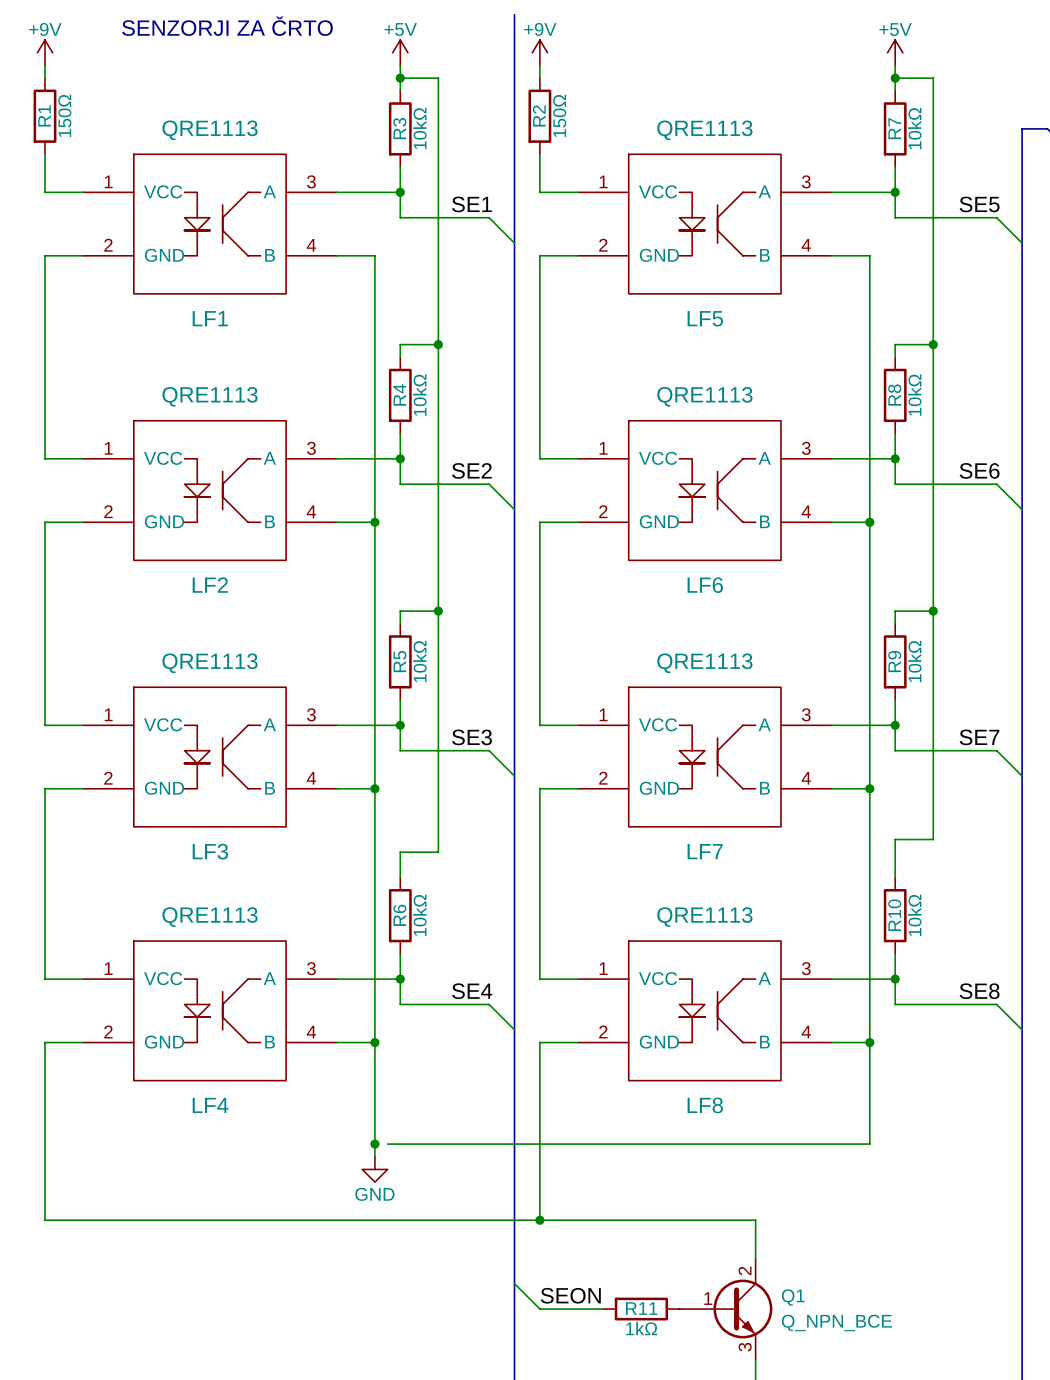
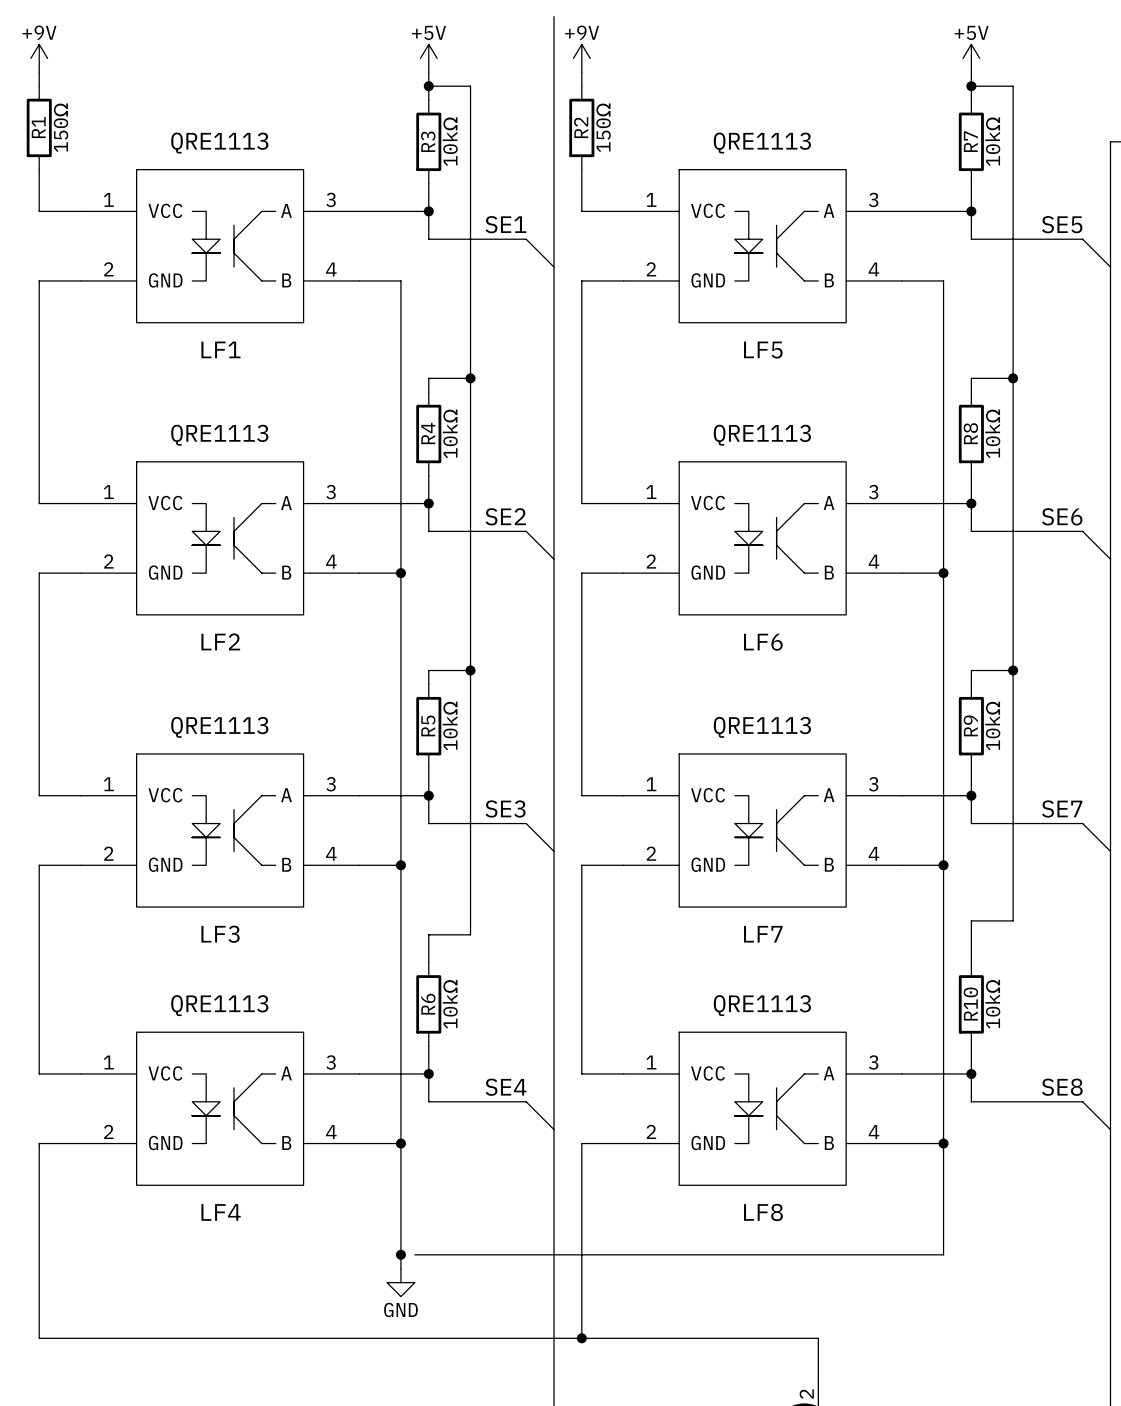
text: SENZORJI ZA ČRTO (227, 26) -> none

